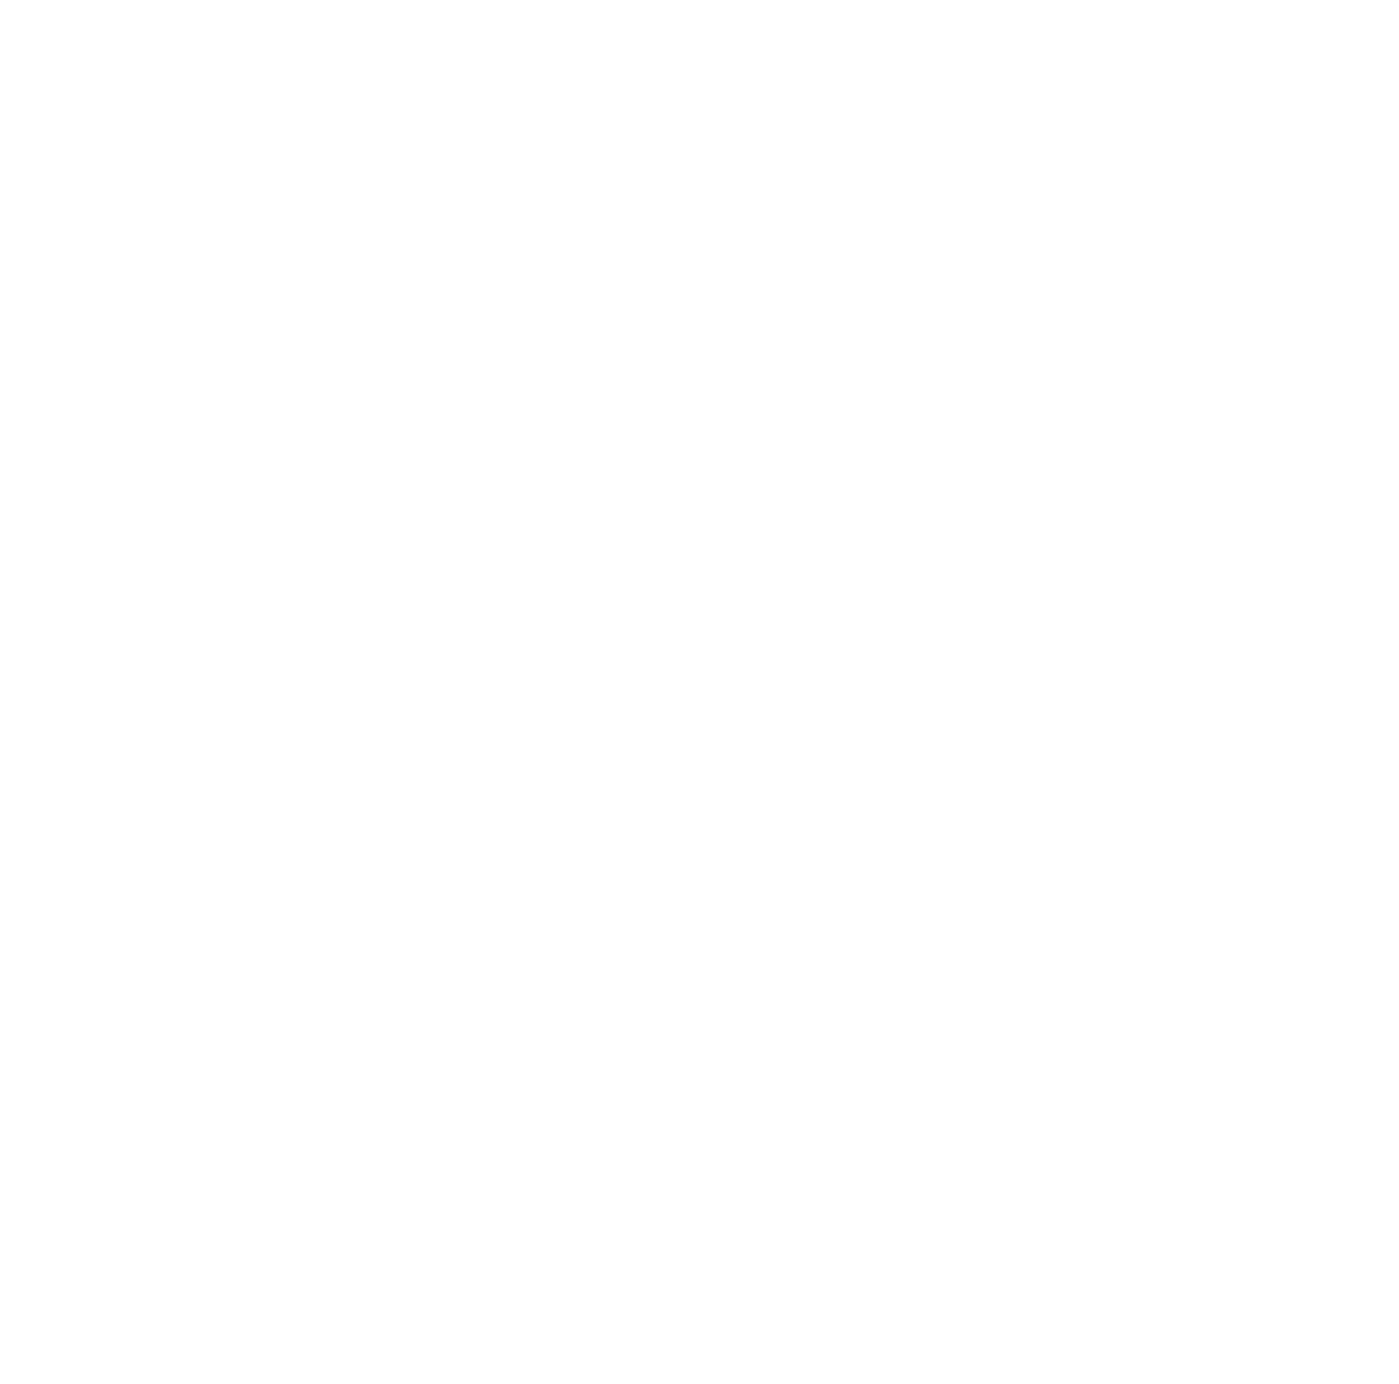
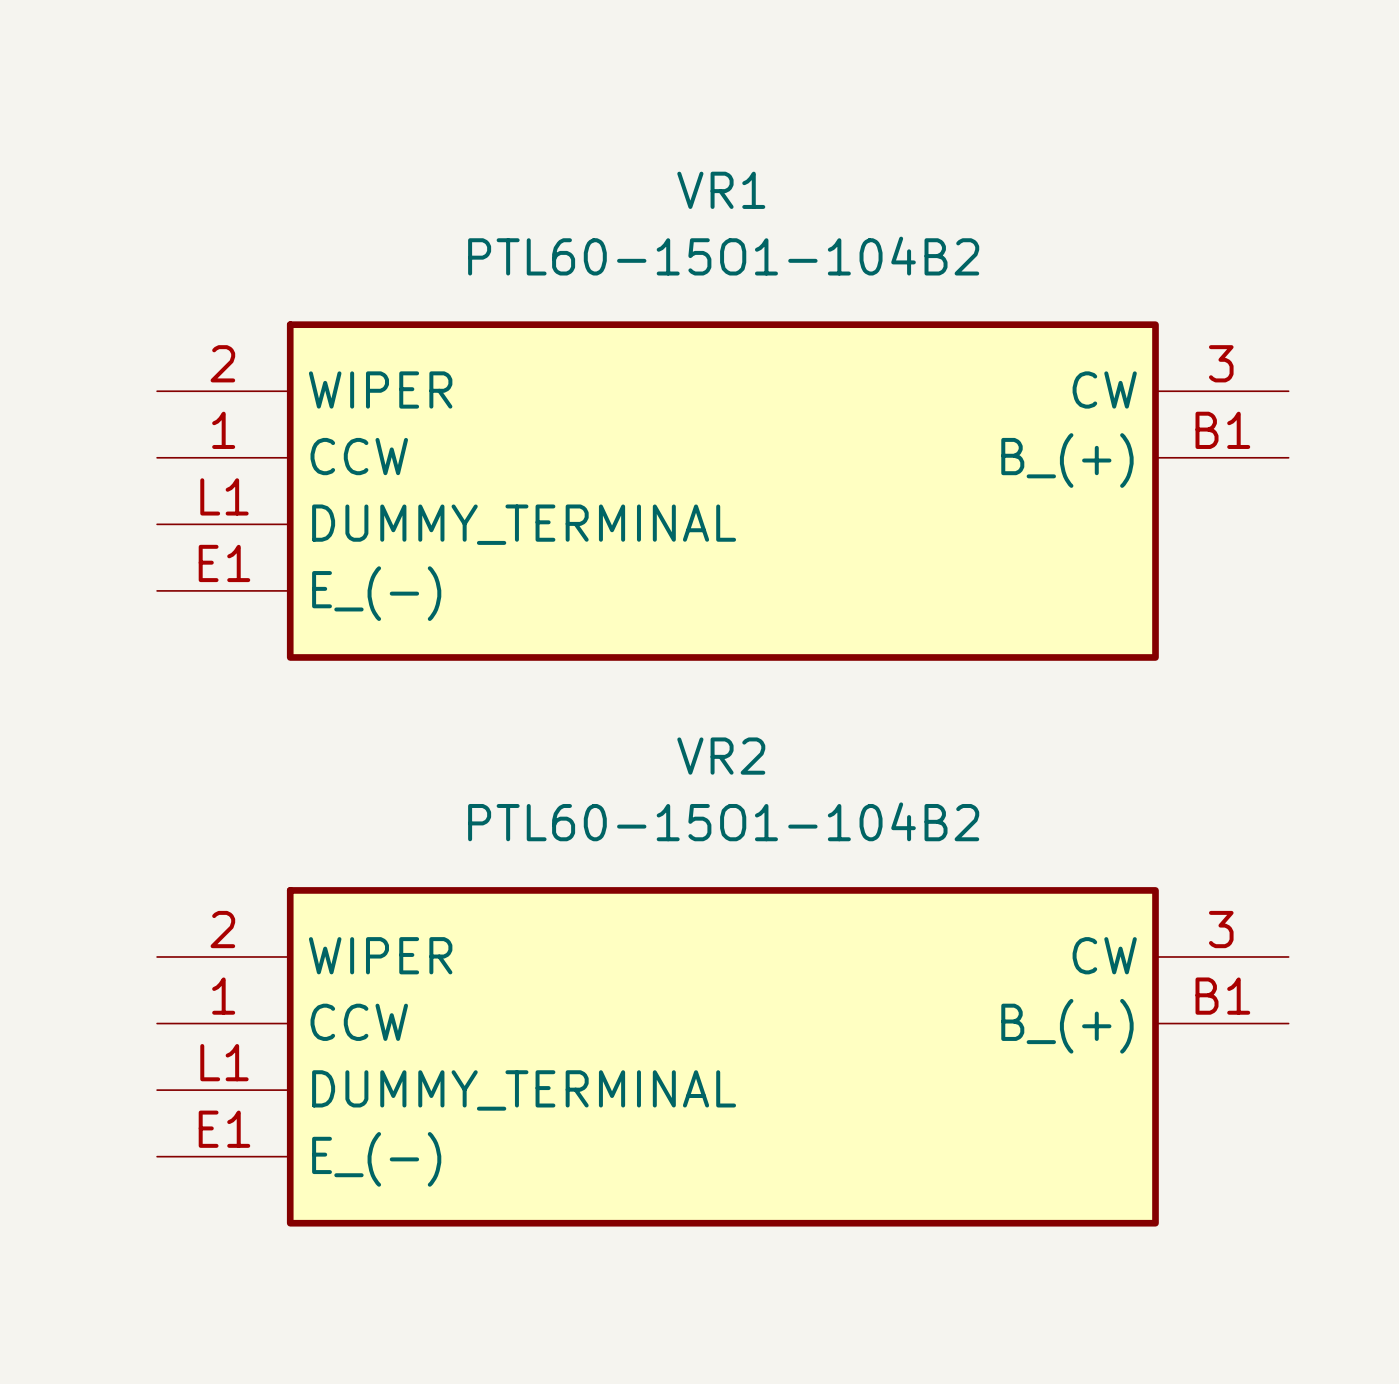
VR1: none -> PTL60-15O1-104B2 (722, 491)
VR2: none -> PTL60-15O1-104B2 (722, 1056)

